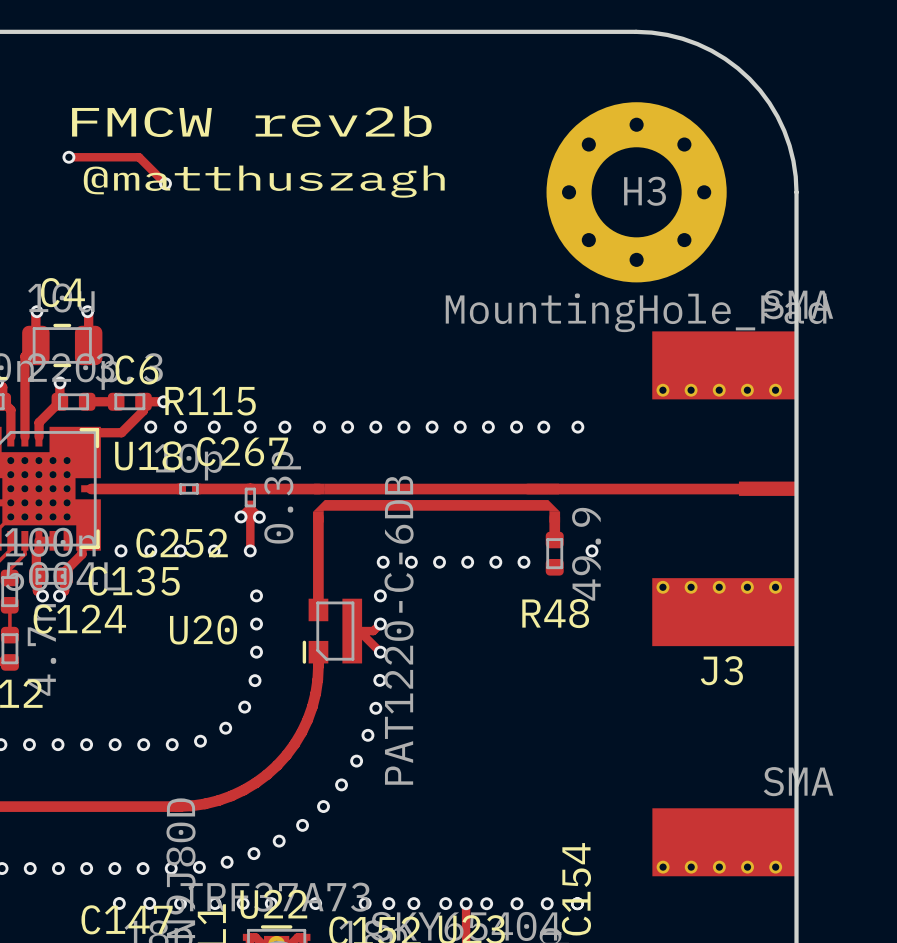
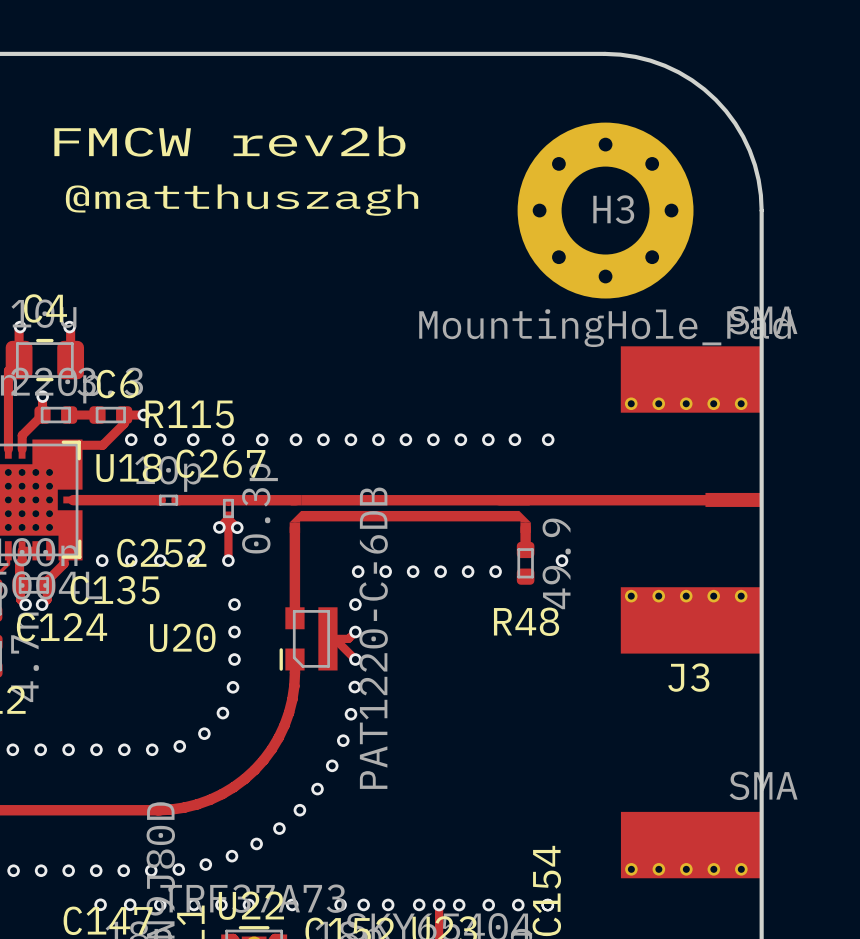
track: (68, 157) (139, 157) (165, 183) -> none
via: (68, 157) -> none
via: (165, 183) -> none

